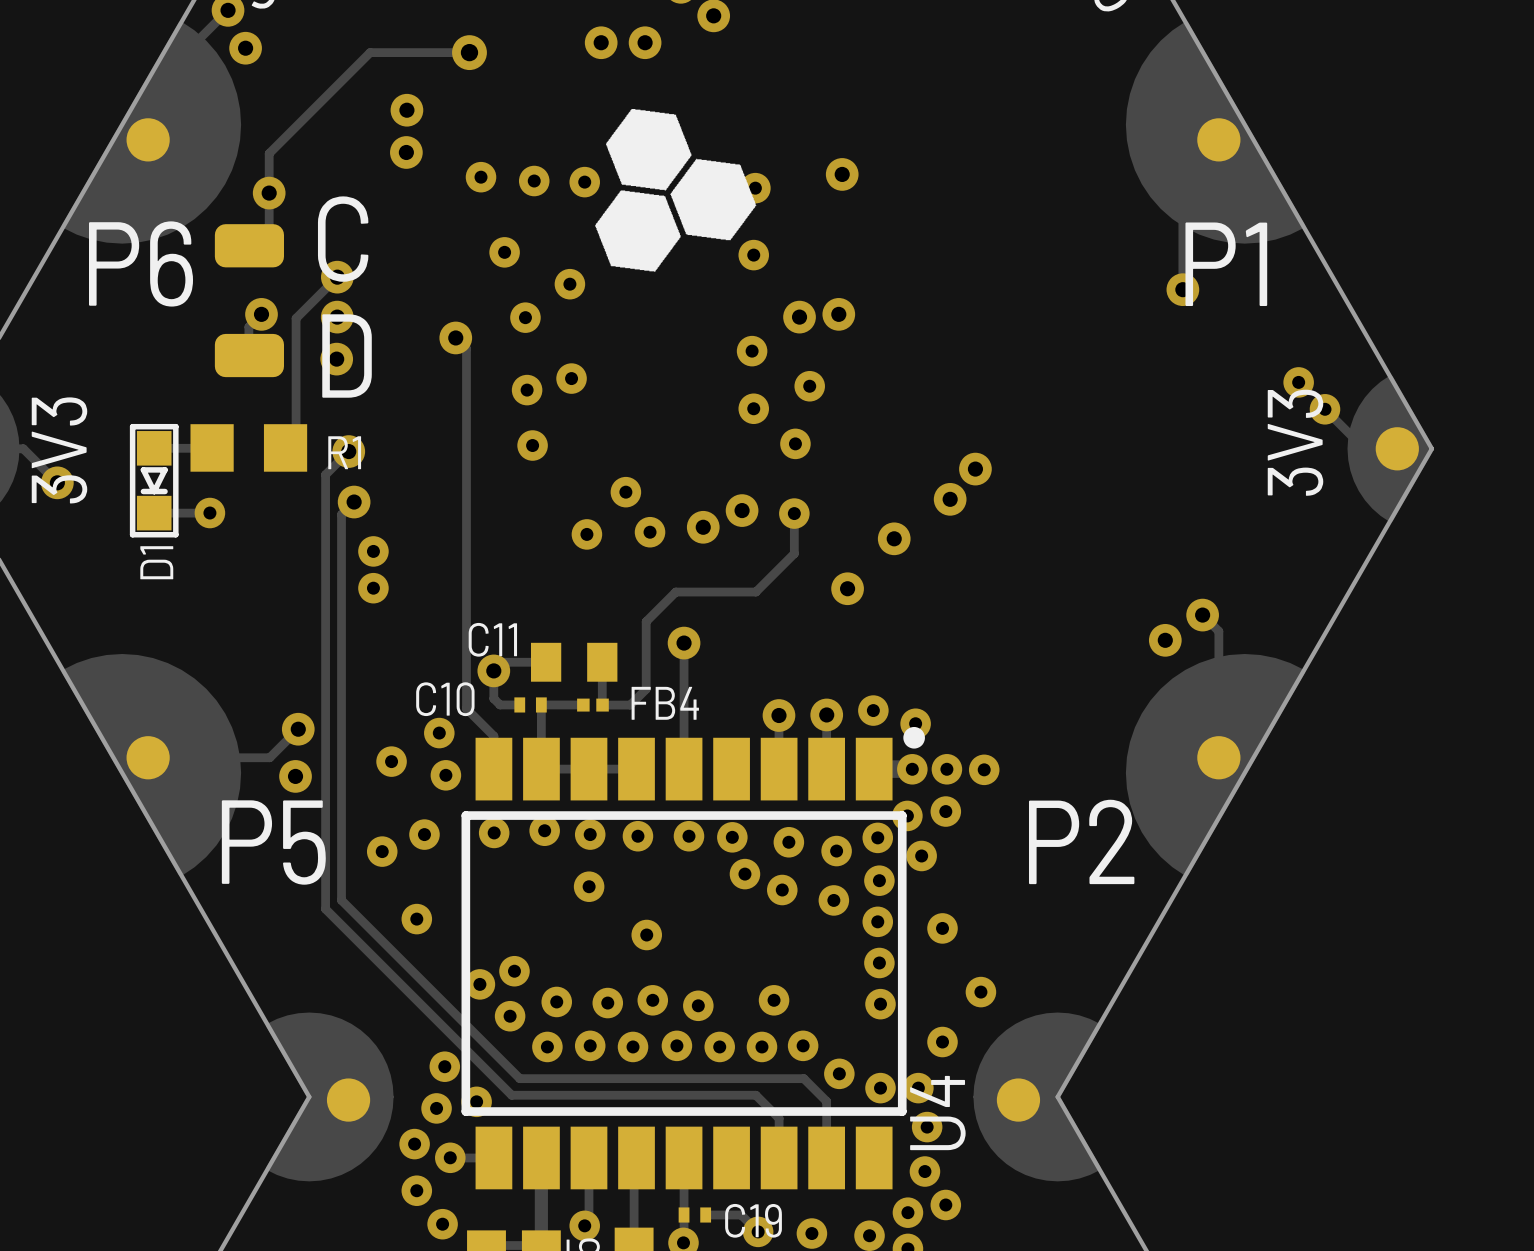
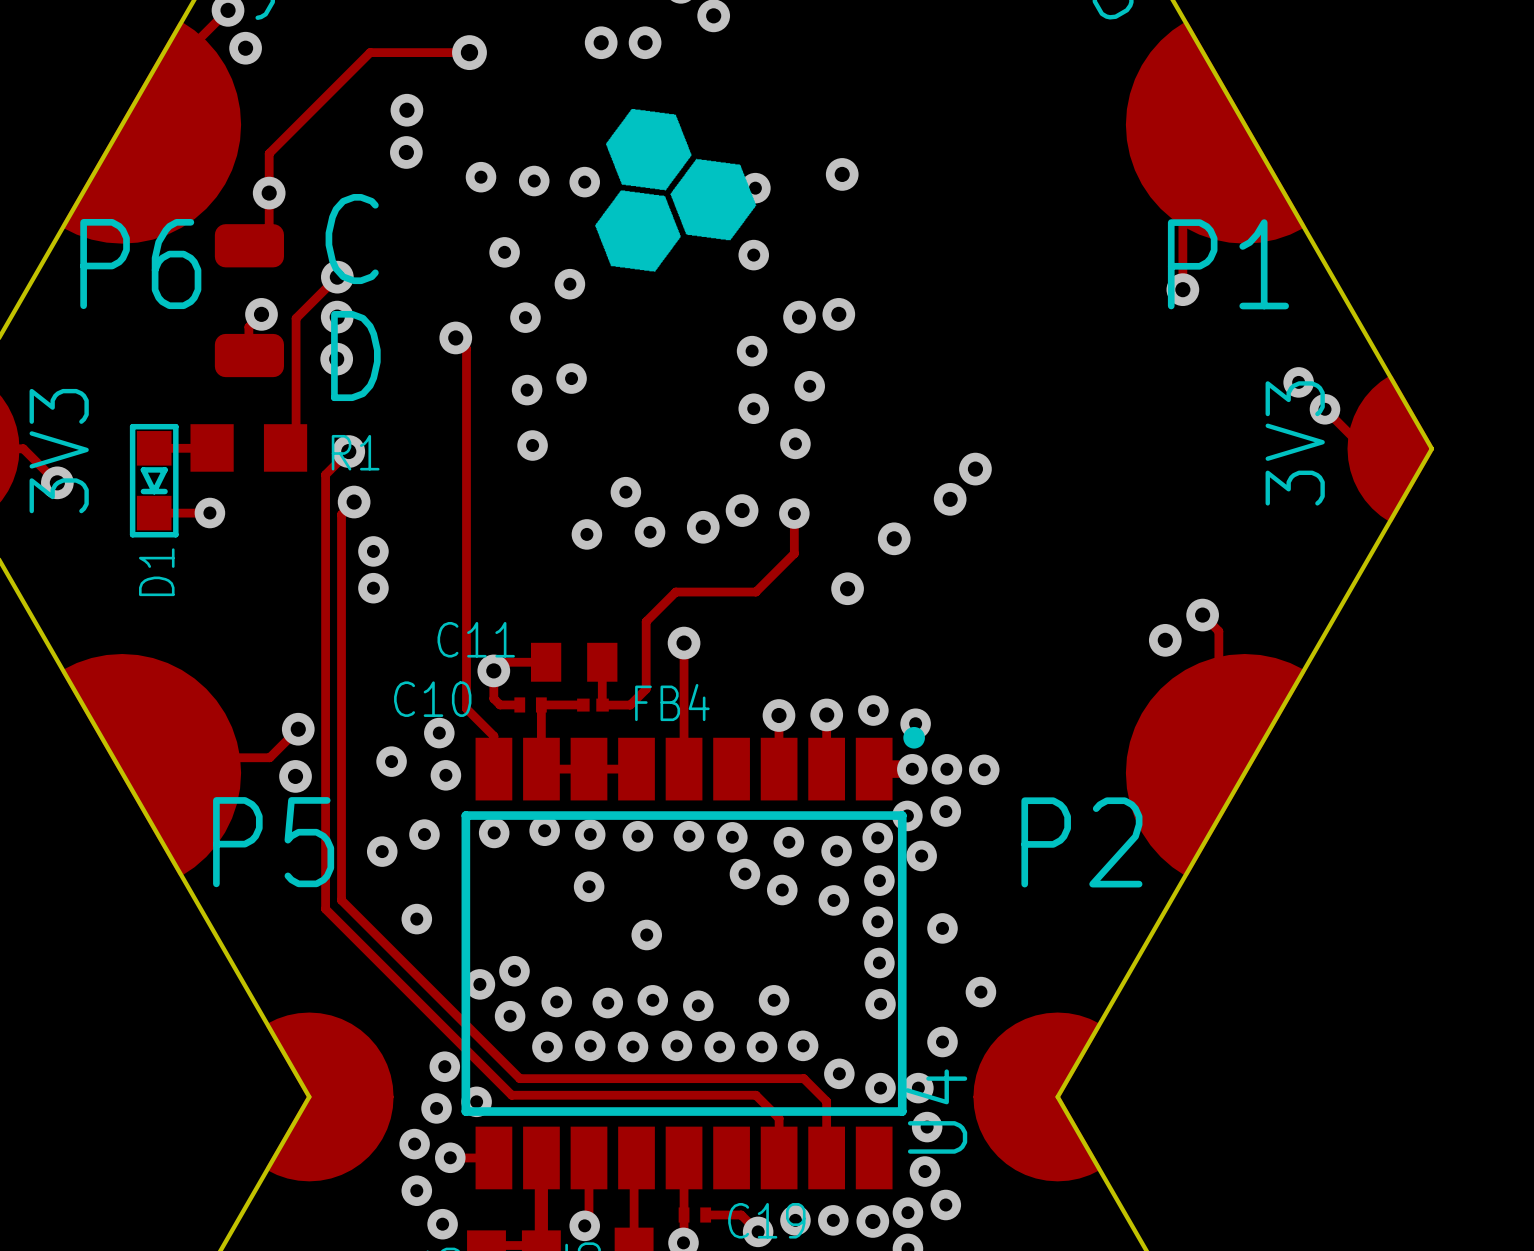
via: none -> (795, 1220)
via: none -> (833, 1220)
via: (811, 1233) -> none
via position: (869, 1235) -> (872, 1221)

